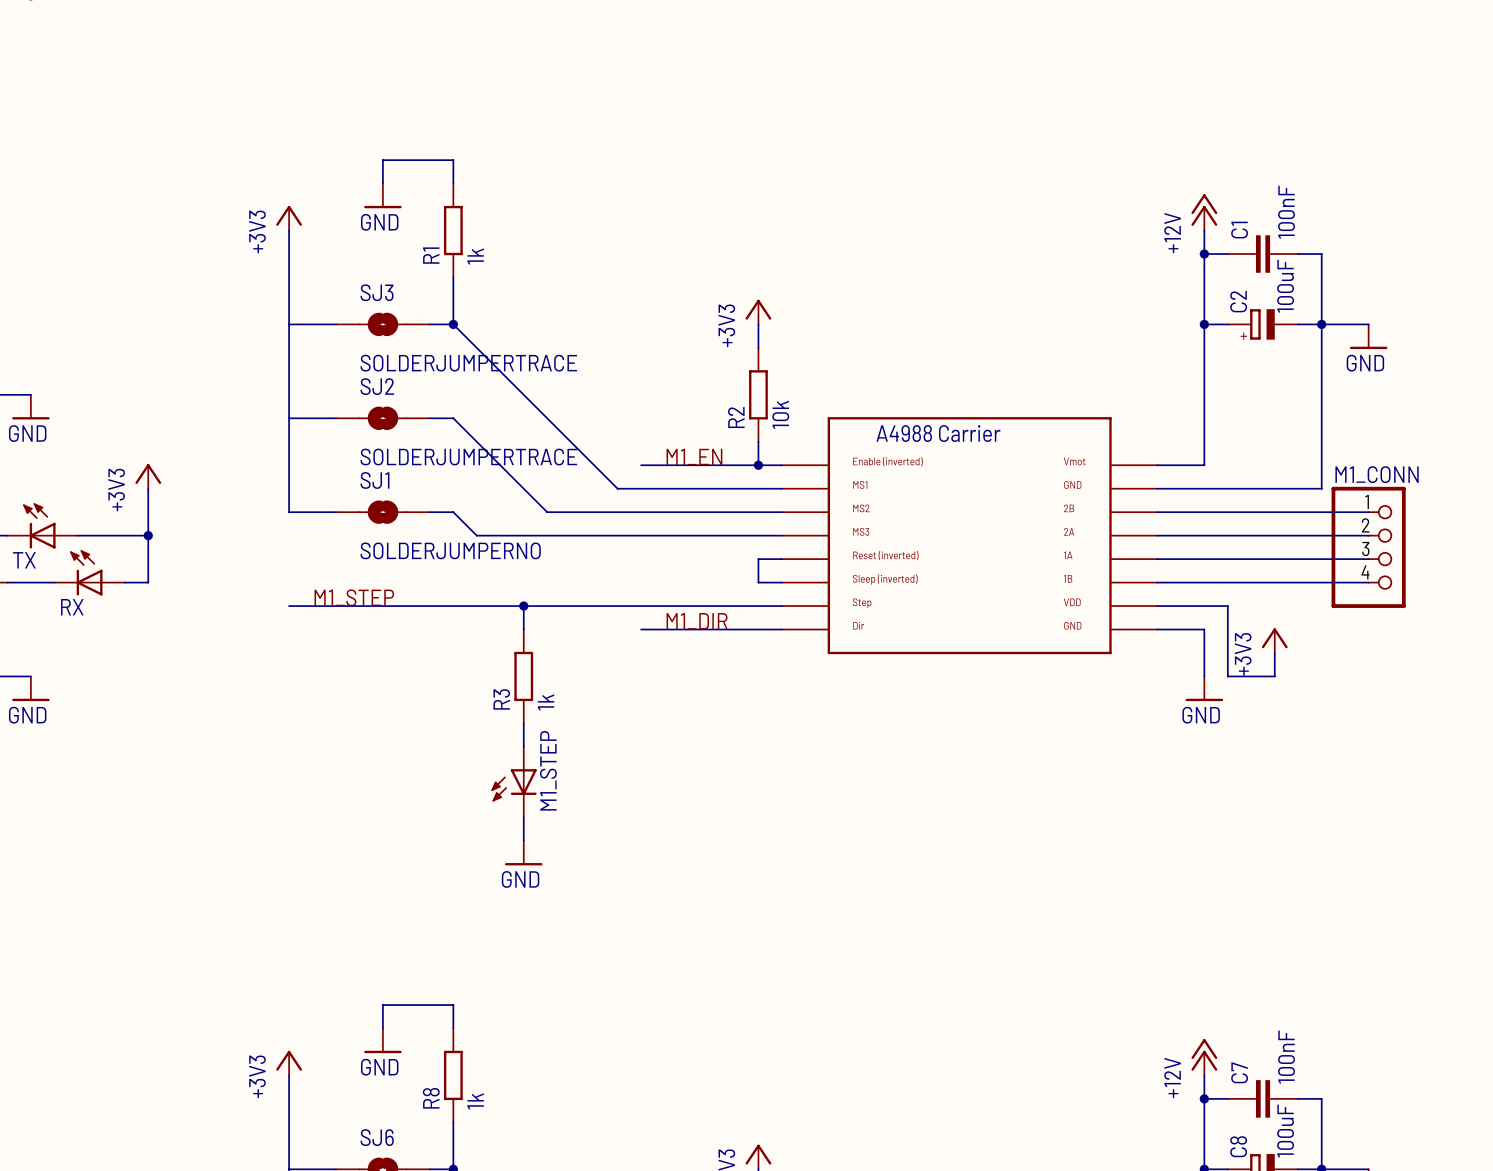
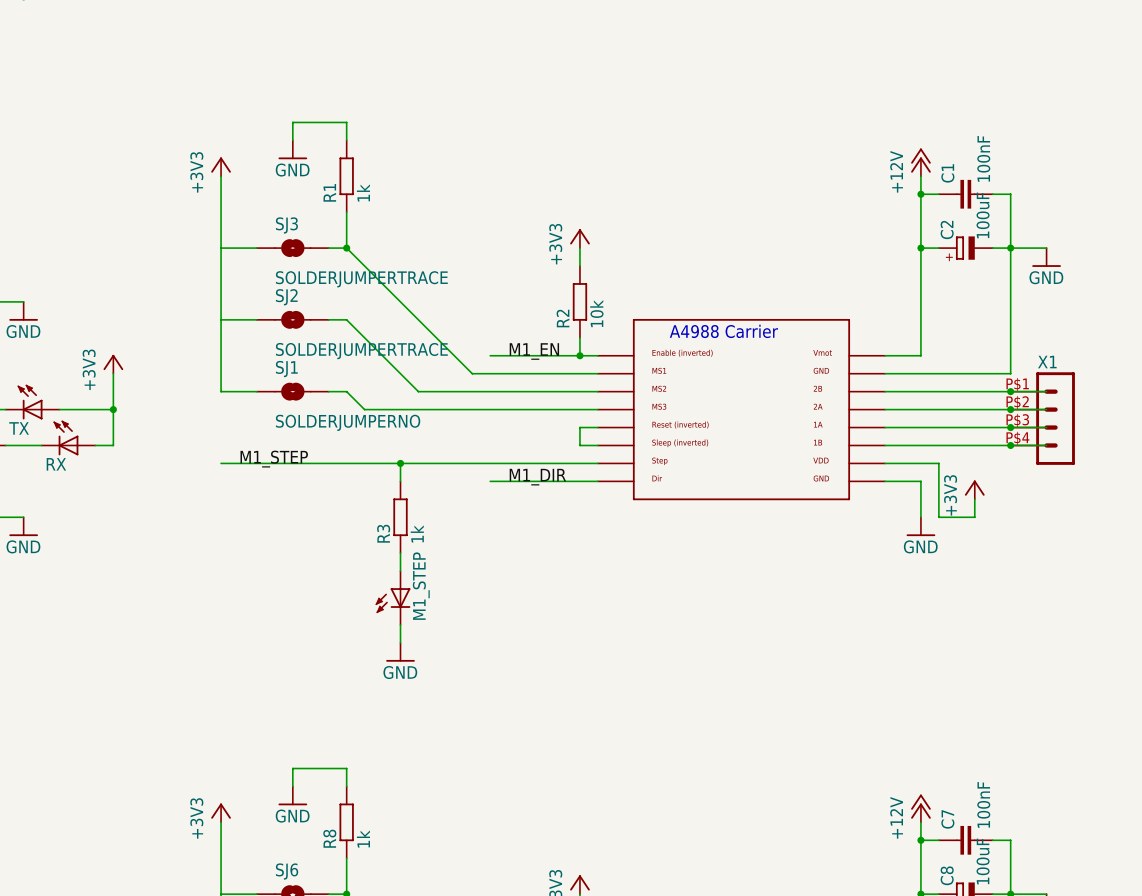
junction: none -> (1010, 391)
junction: none -> (1010, 409)
X1: none -> (1042, 418)
M1_CONN: (1368, 547) -> none
junction: none -> (1010, 427)
junction: none -> (1010, 445)

